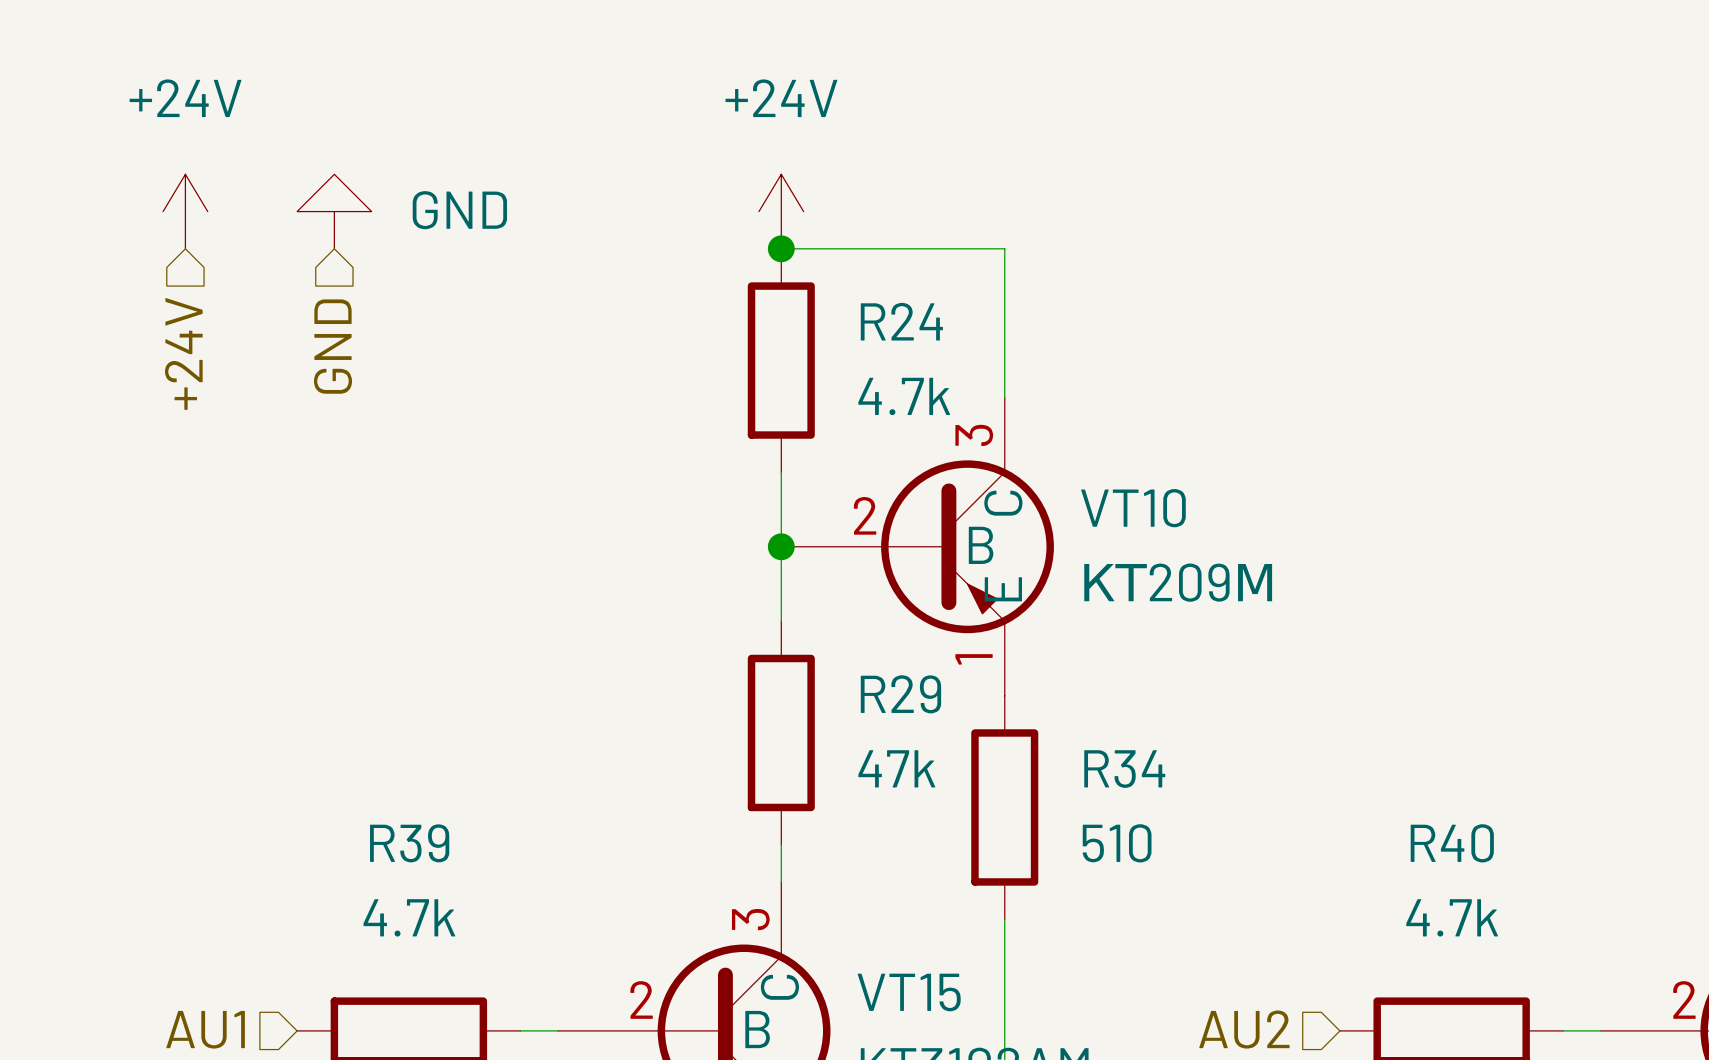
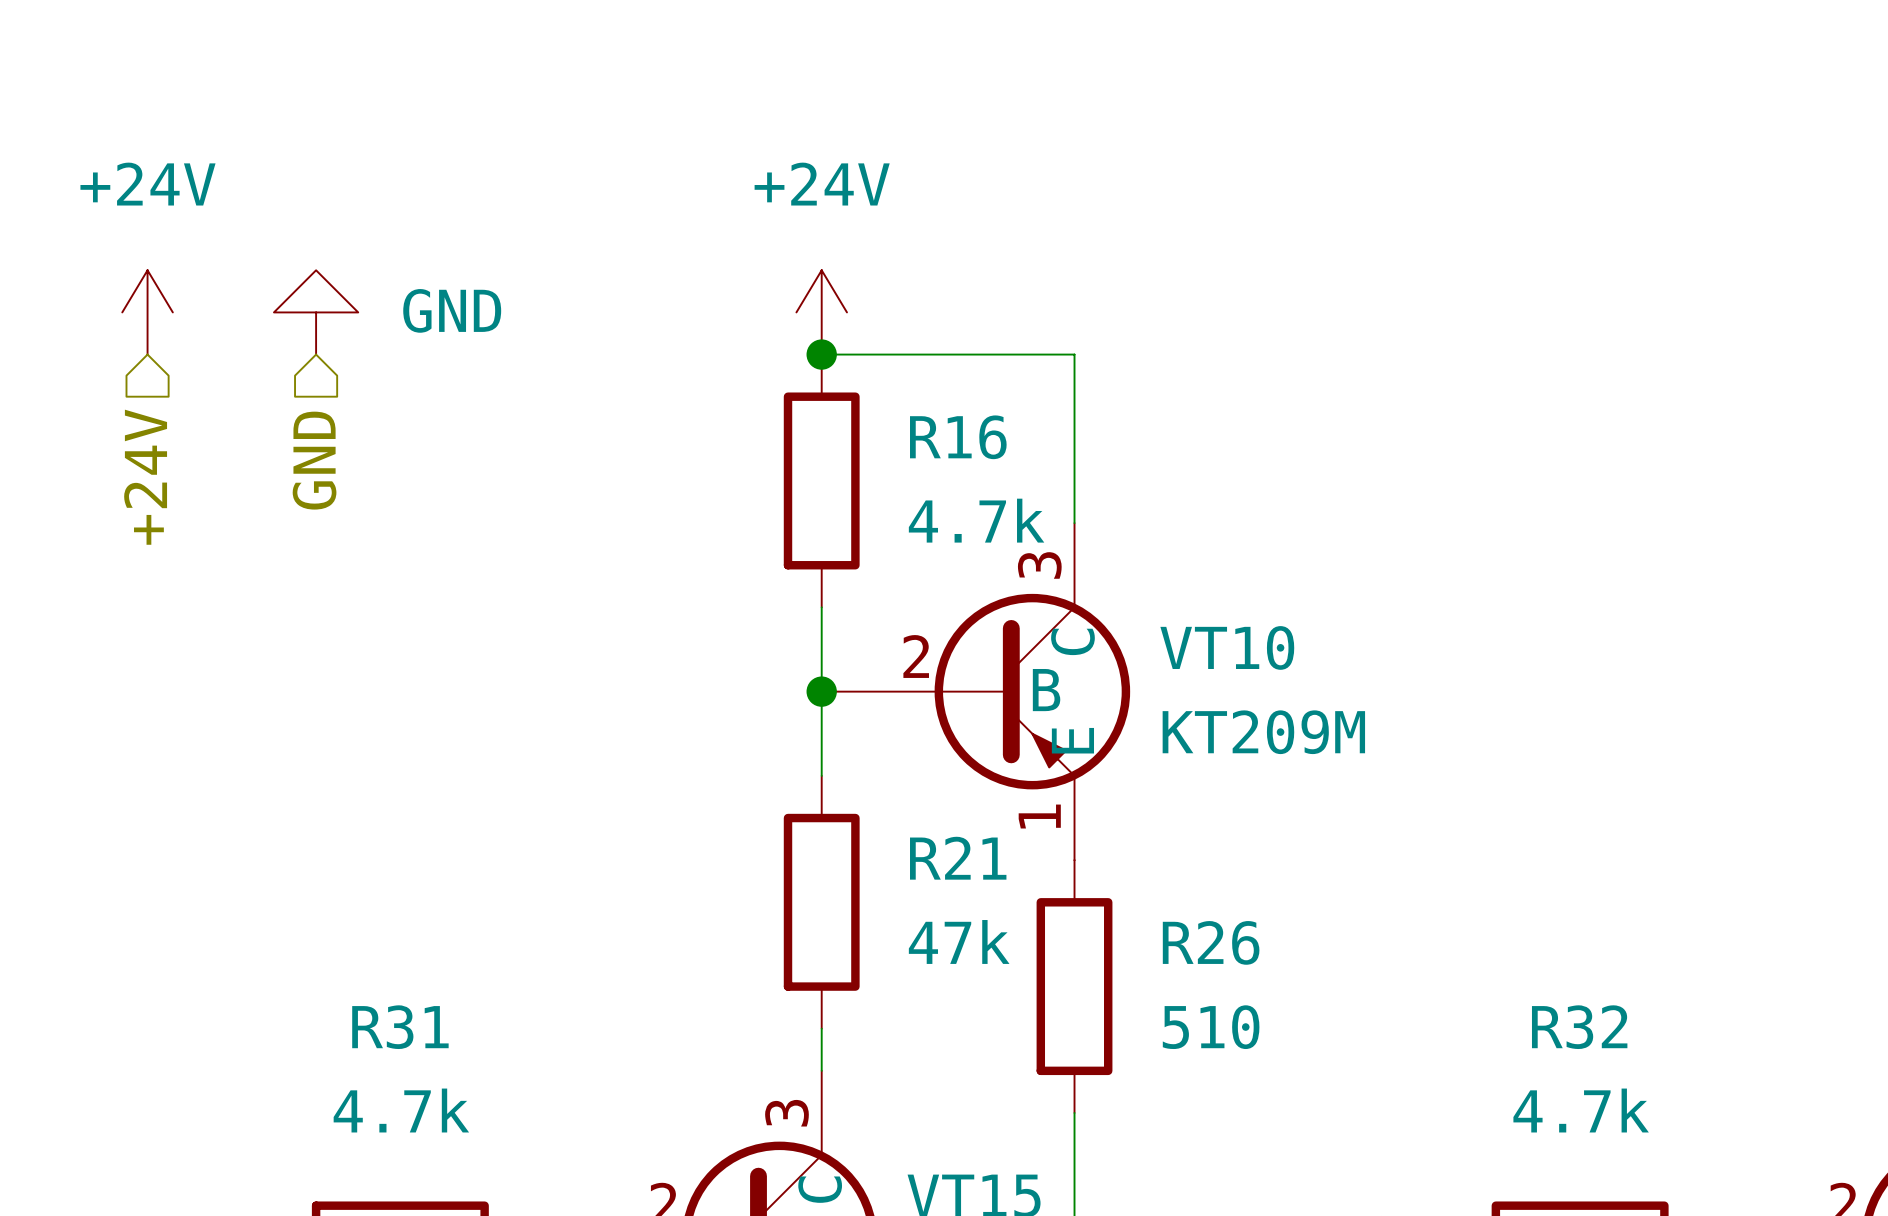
R24 name: R24 (901, 321) -> R16 (958, 437)
R29 name: R29 (900, 694) -> R21 (958, 858)
R34 name: R34 (1124, 769) -> R26 (1211, 942)
R39 name: R39 (409, 843) -> R31 (400, 1027)
R40 name: R40 (1452, 843) -> R32 (1579, 1027)

